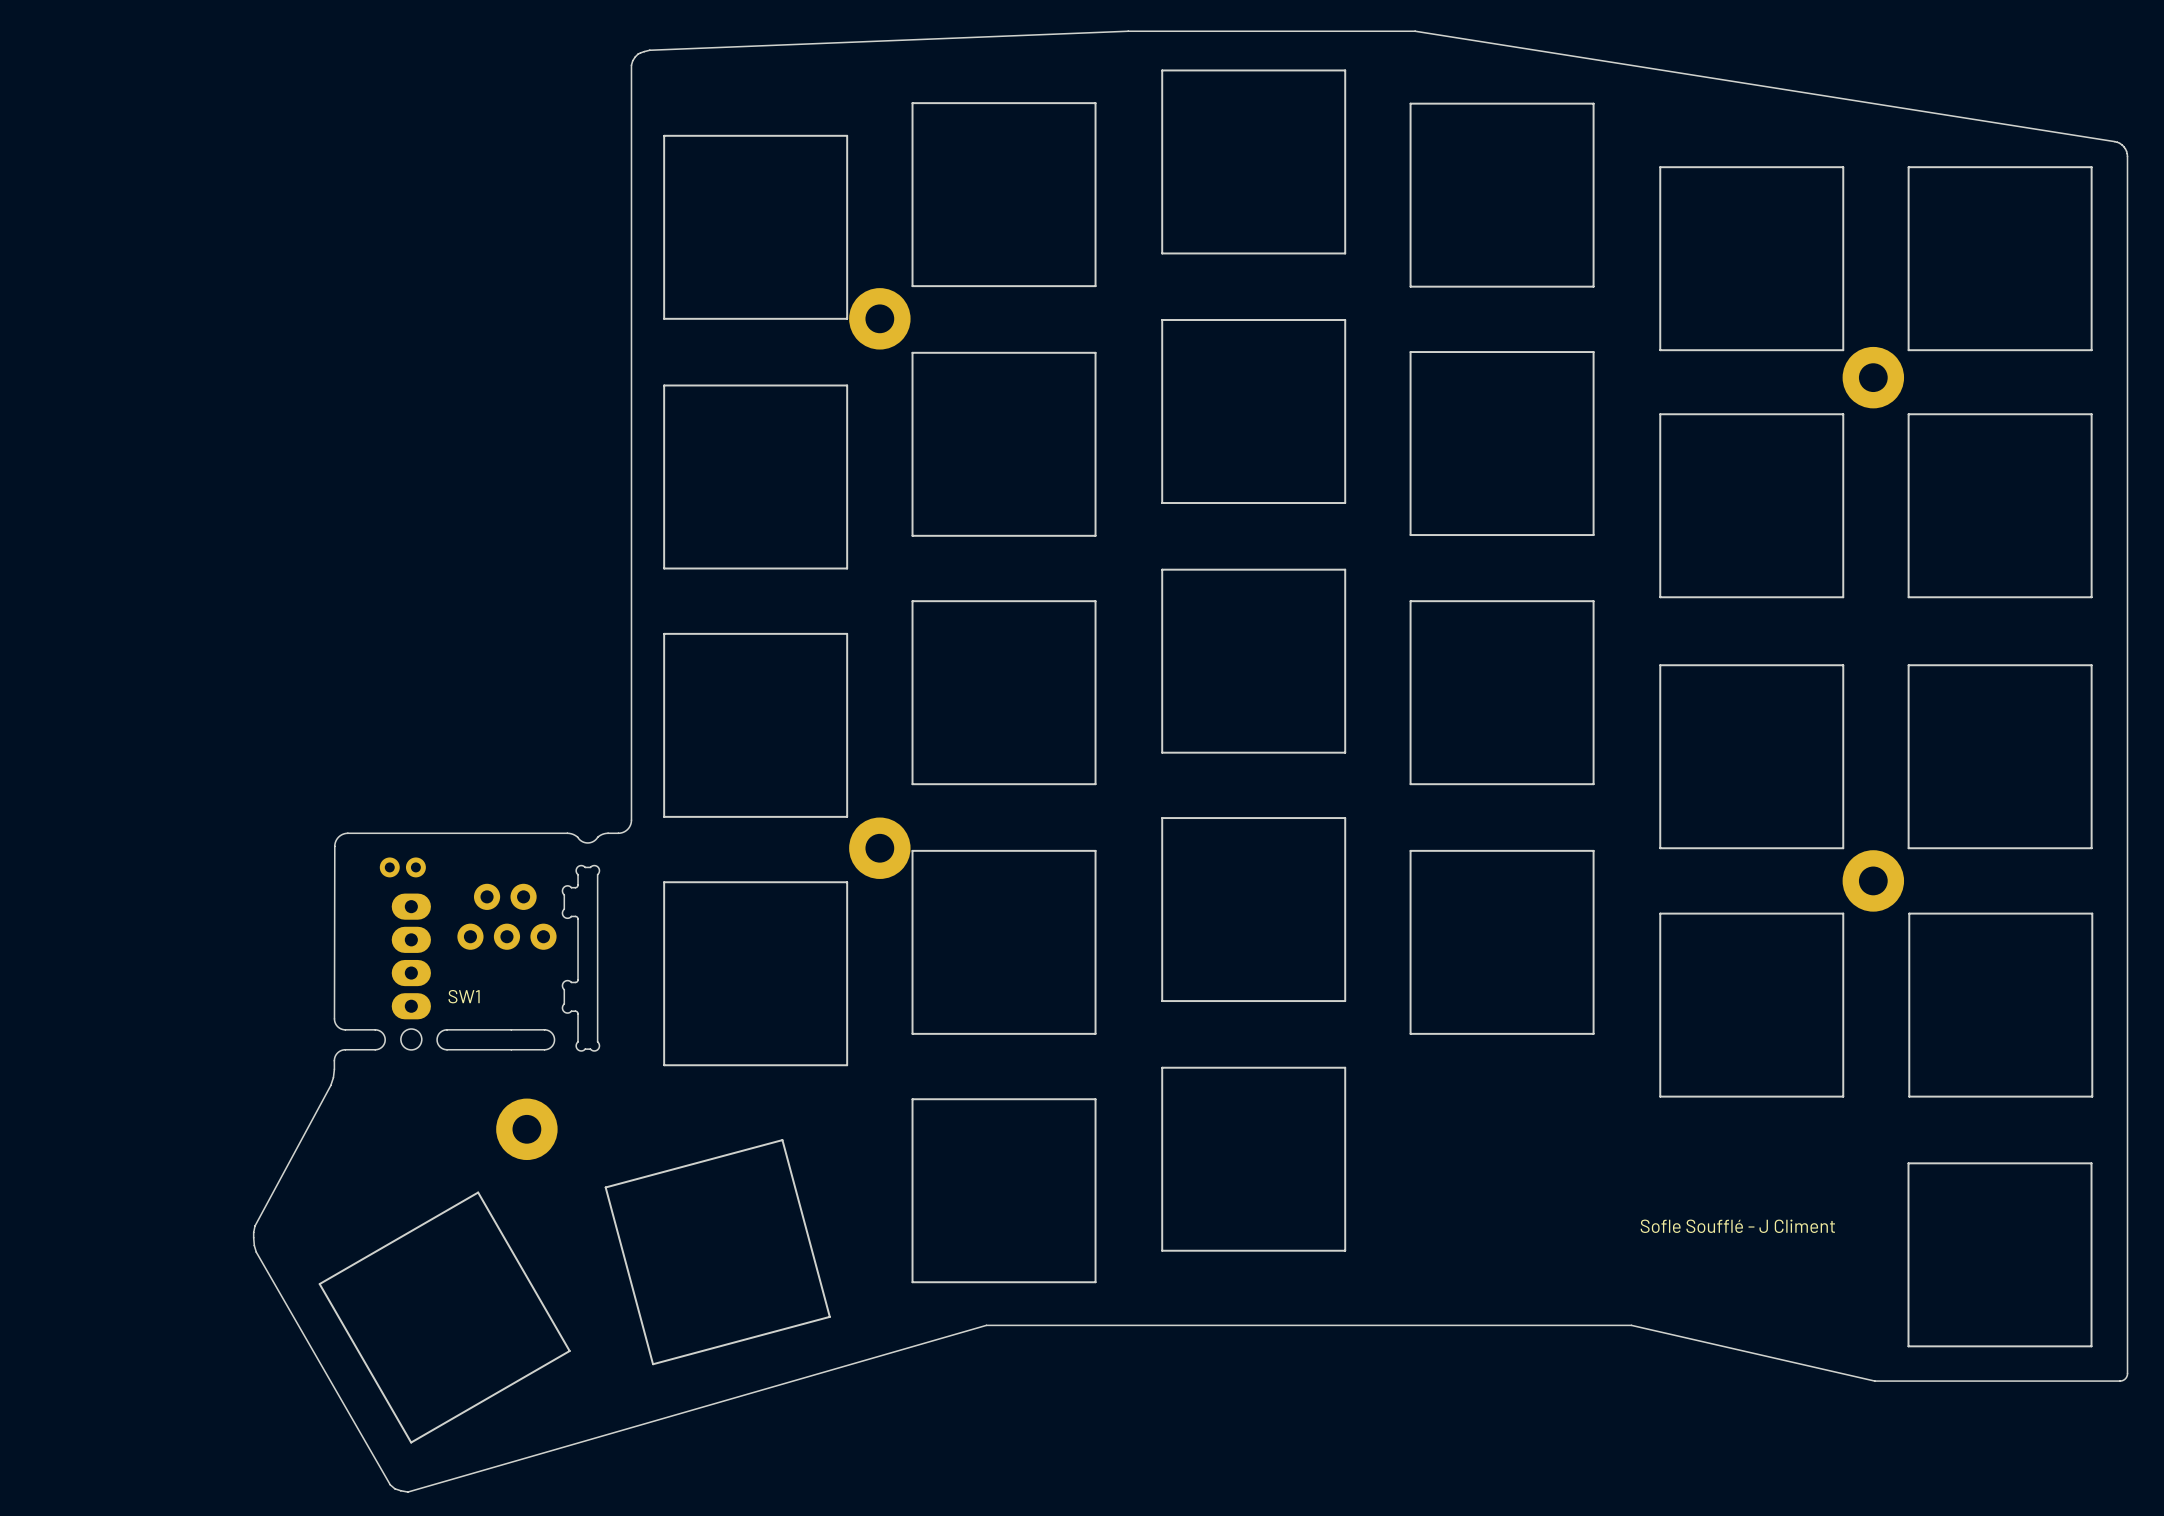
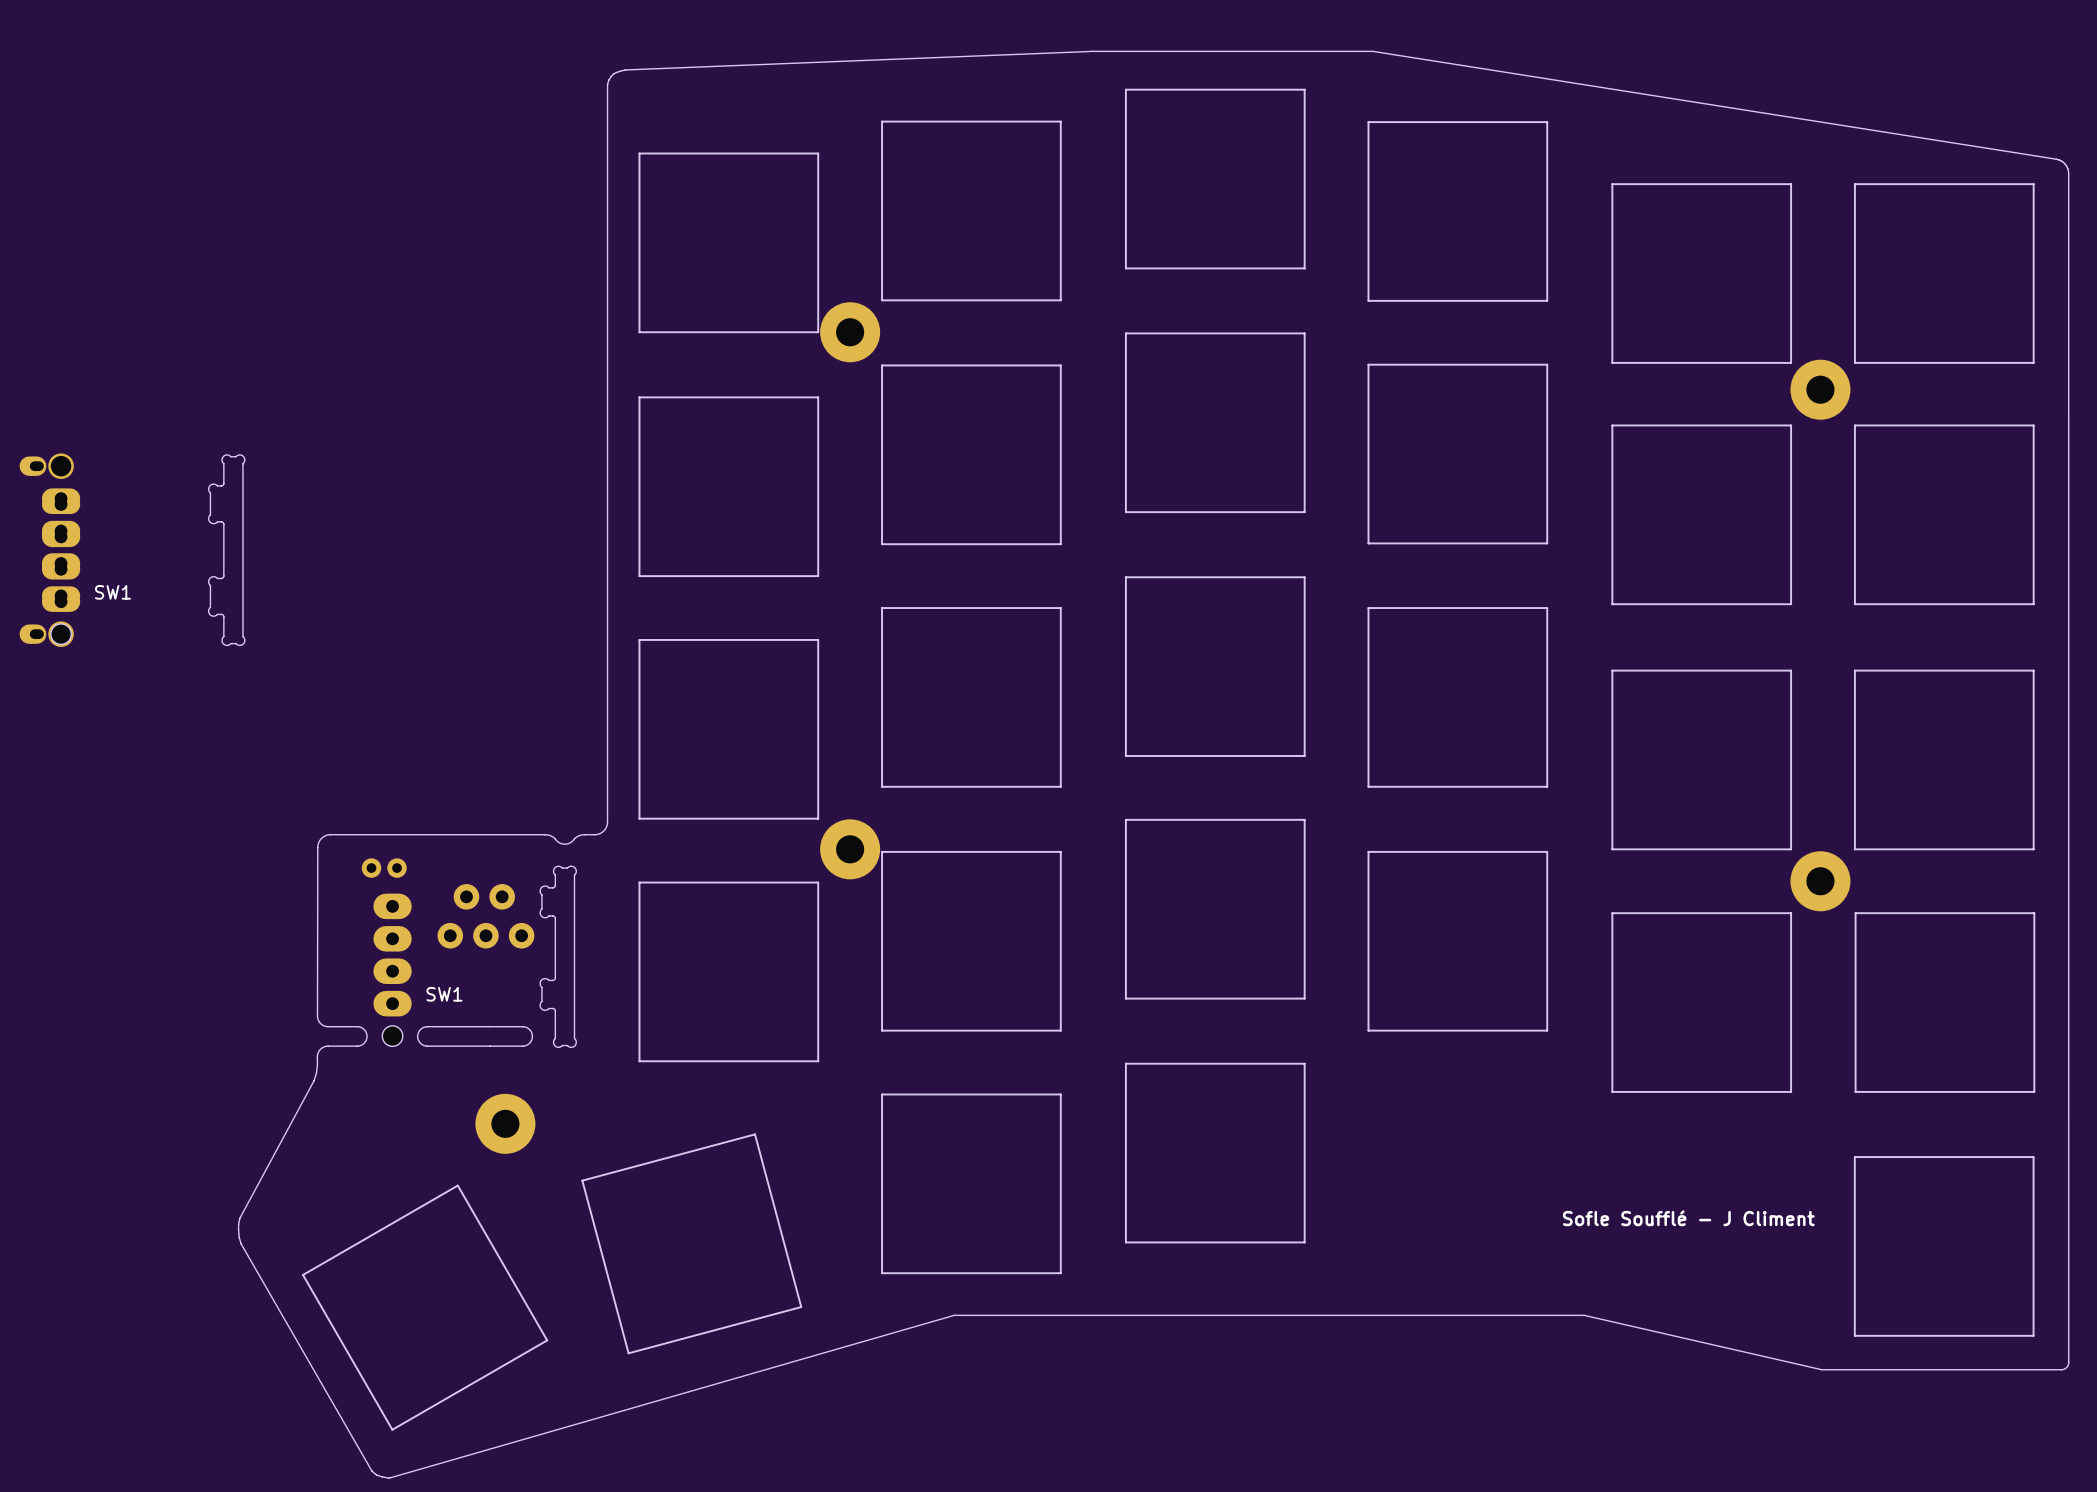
SW1: none -> (132, 550)

